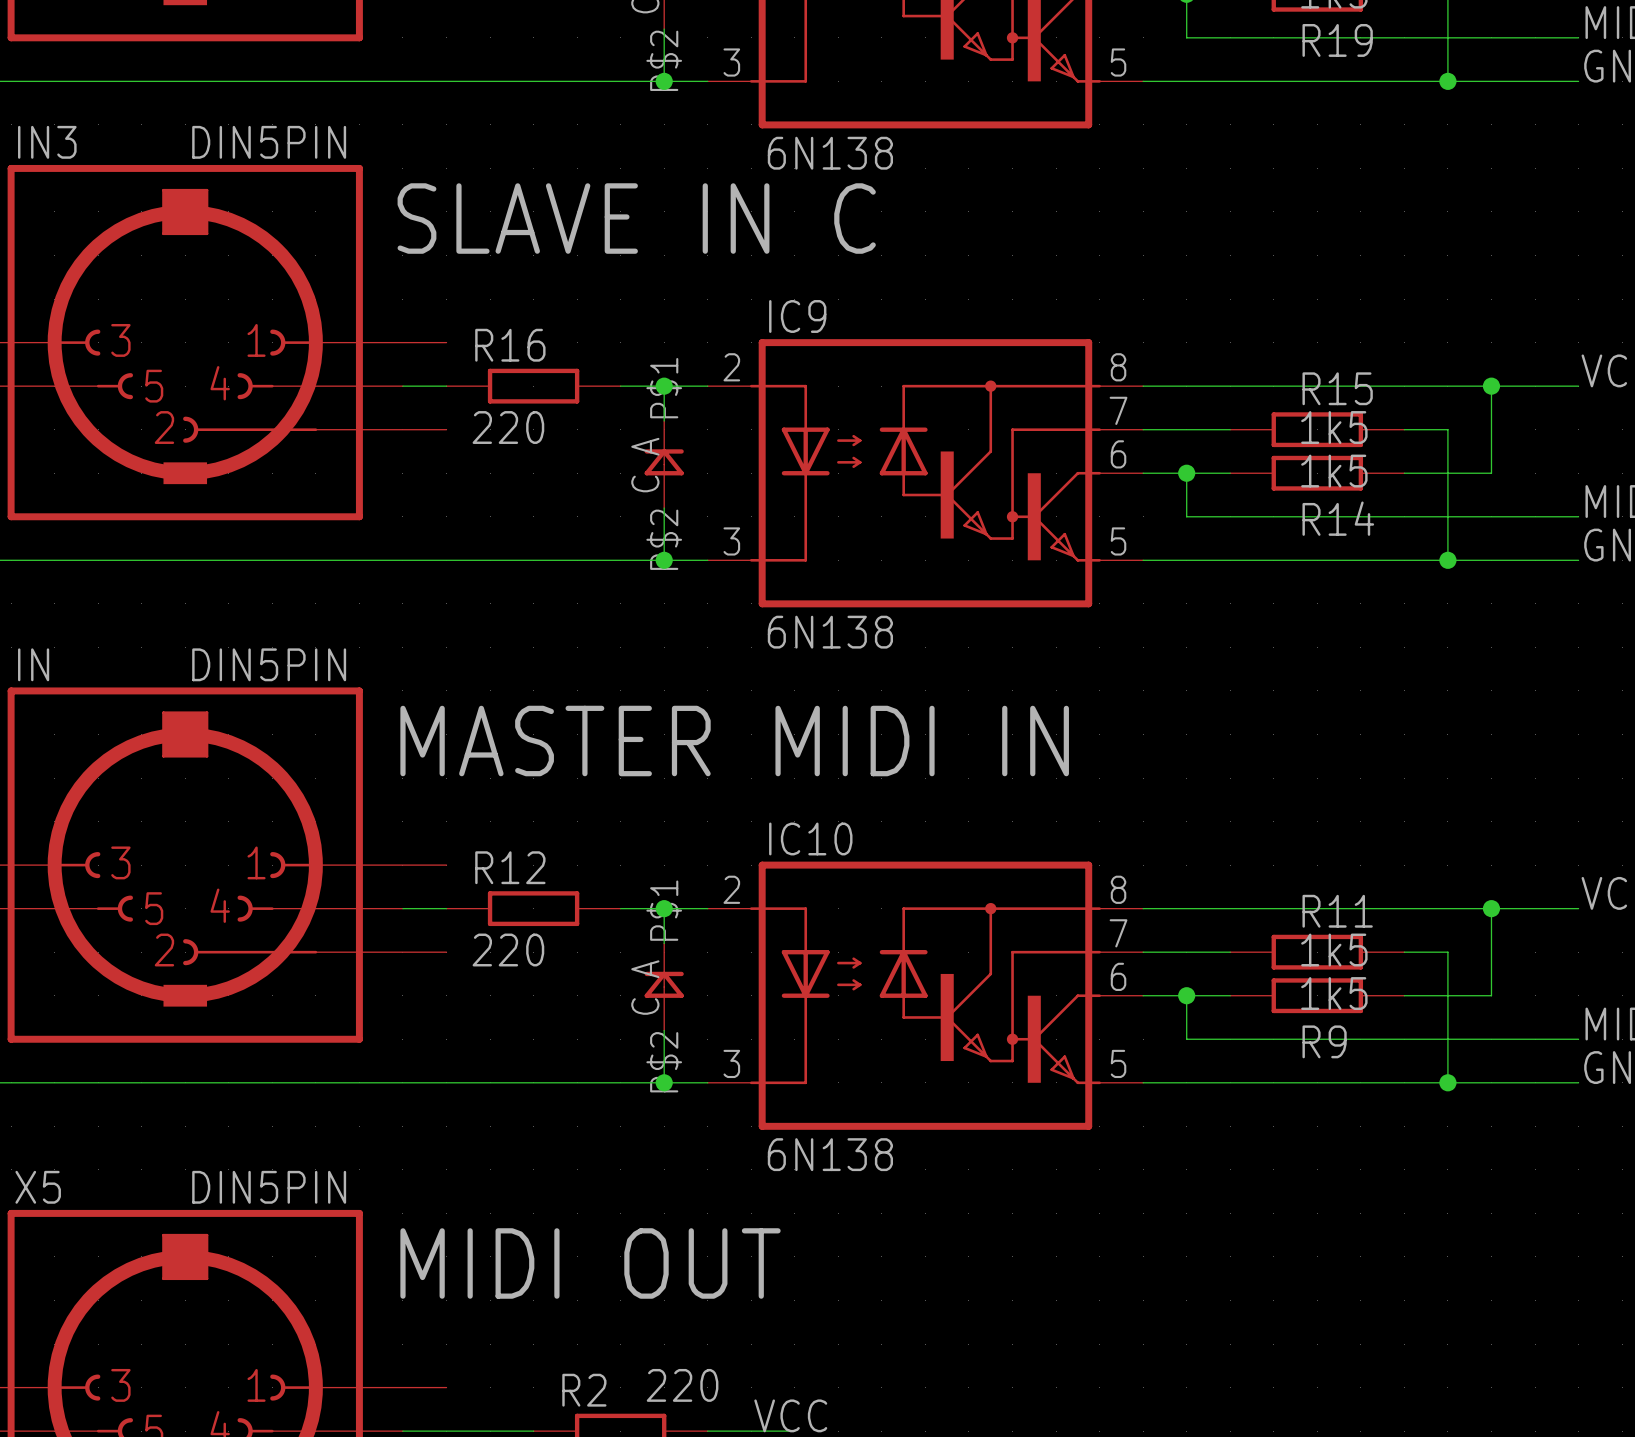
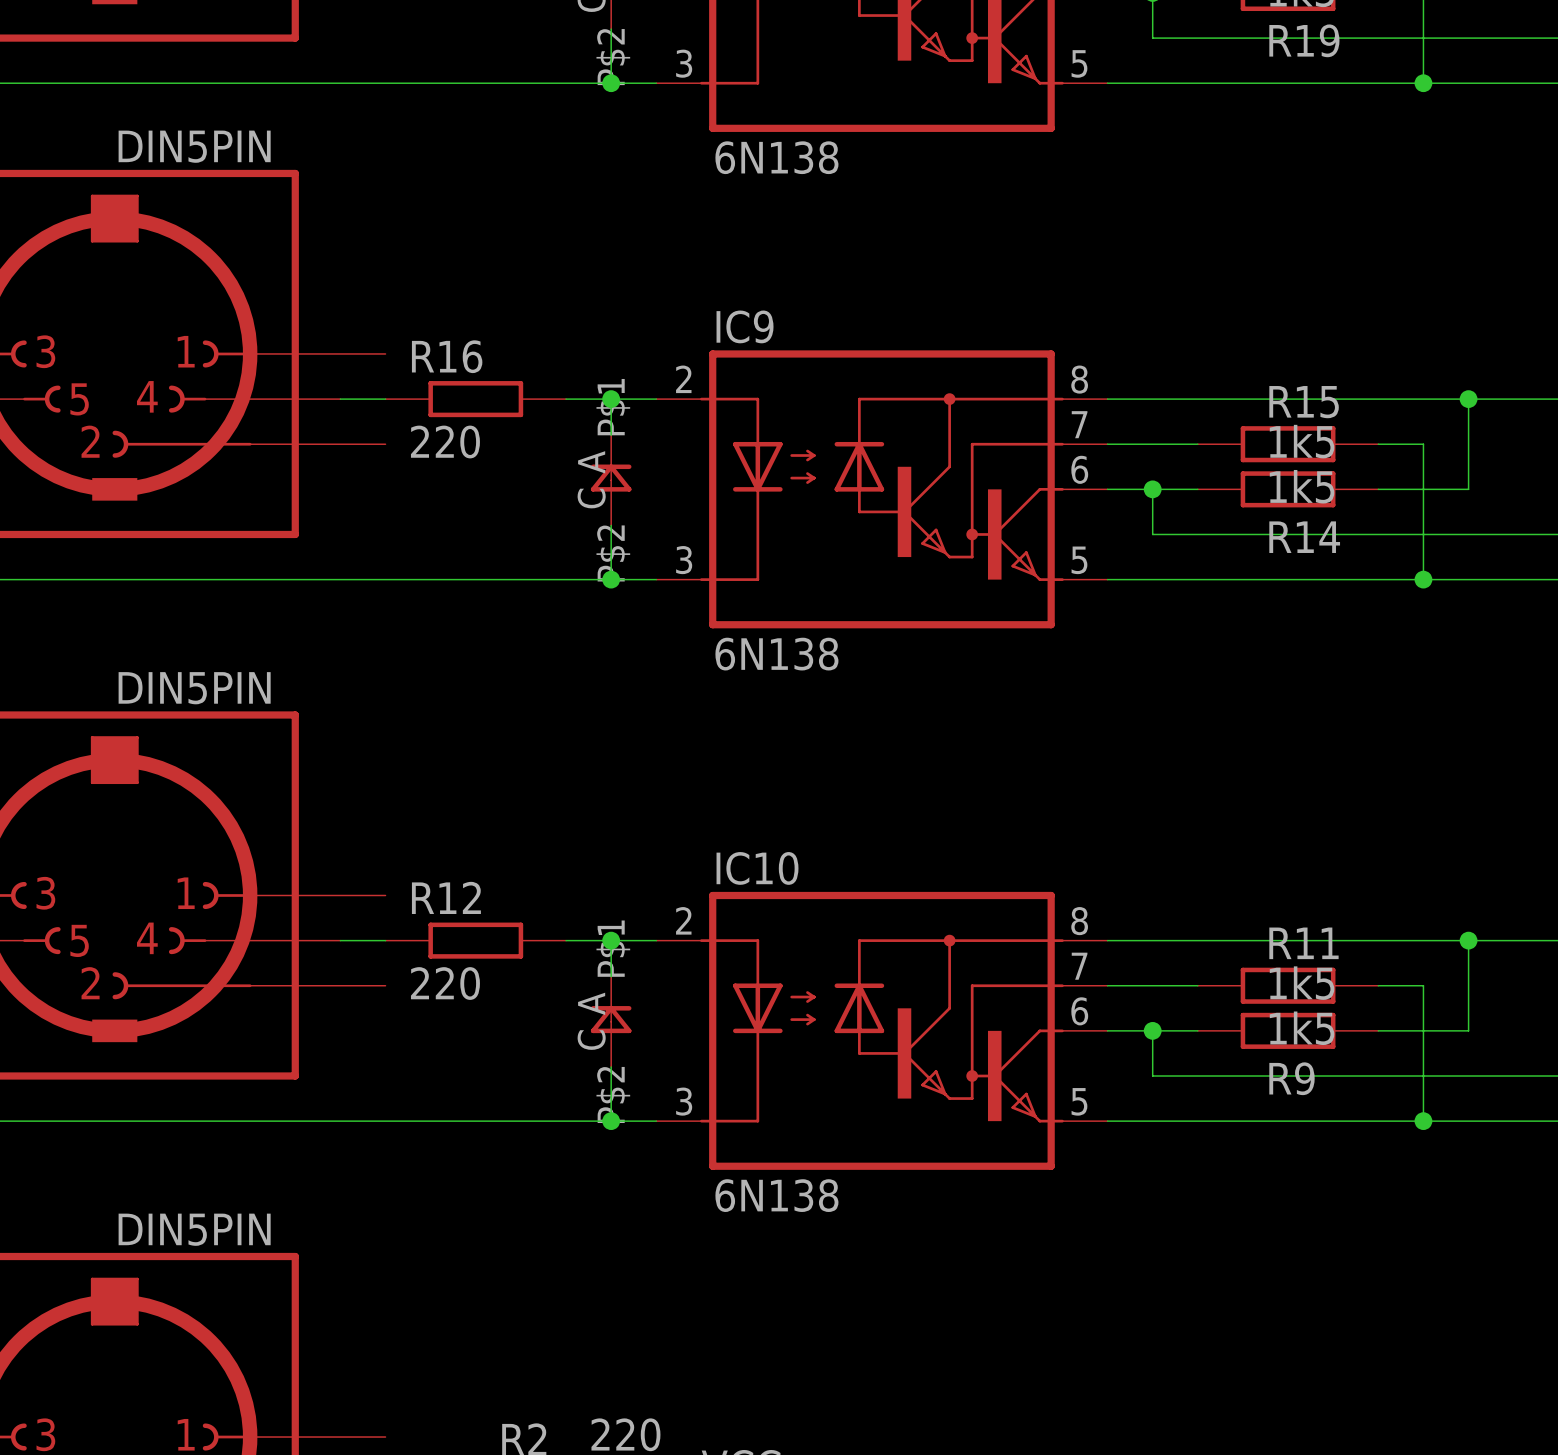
text: SLAVE IN C (636, 218) -> none
text: MASTER MIDI IN (734, 741) -> none
text: MIDI OUT (590, 1263) -> none

